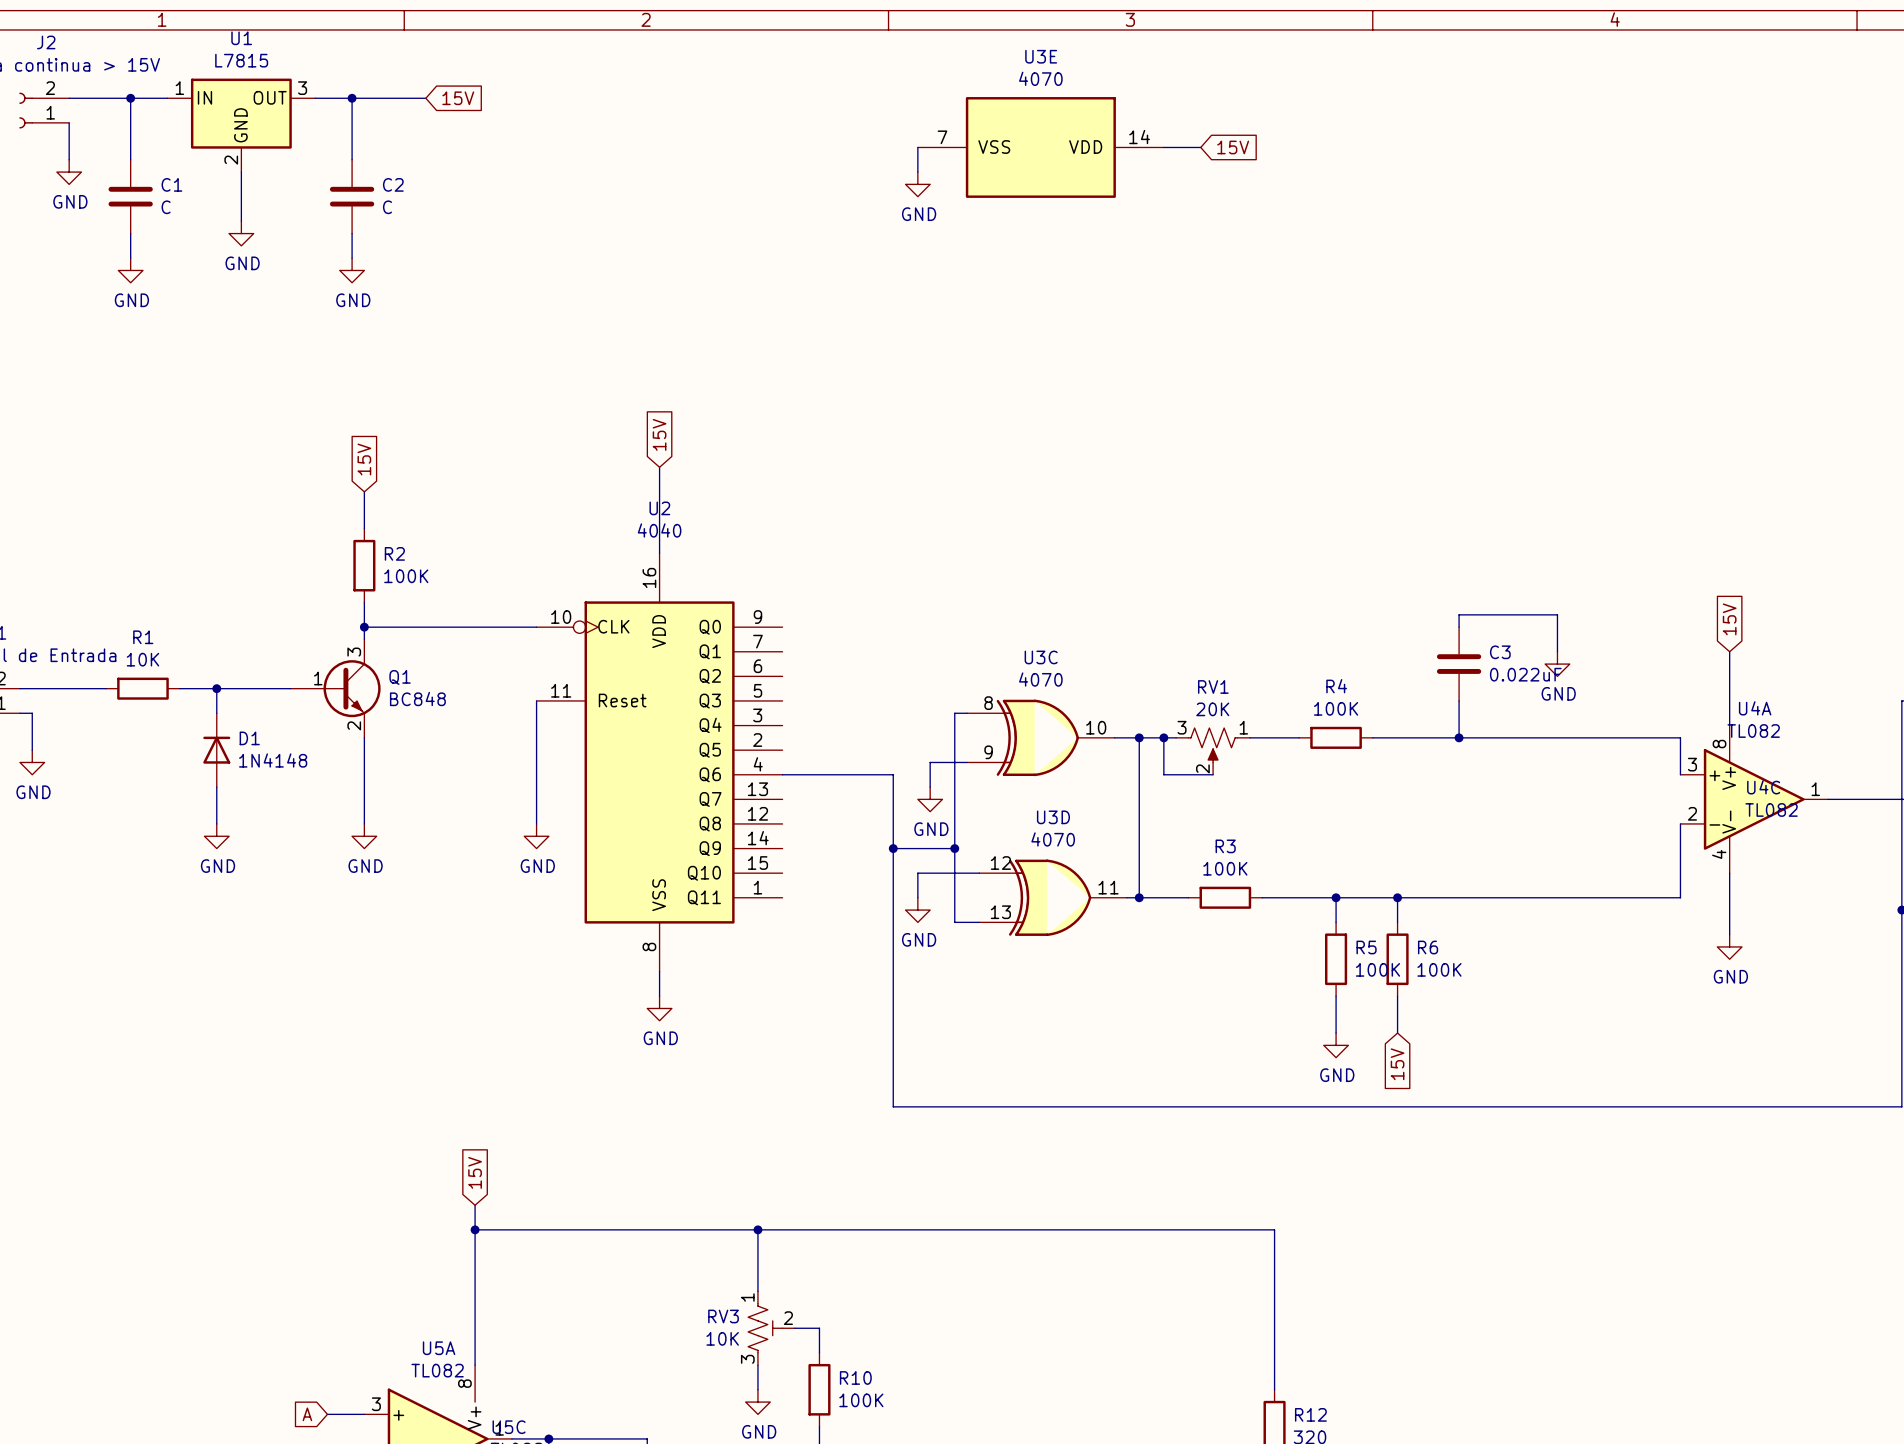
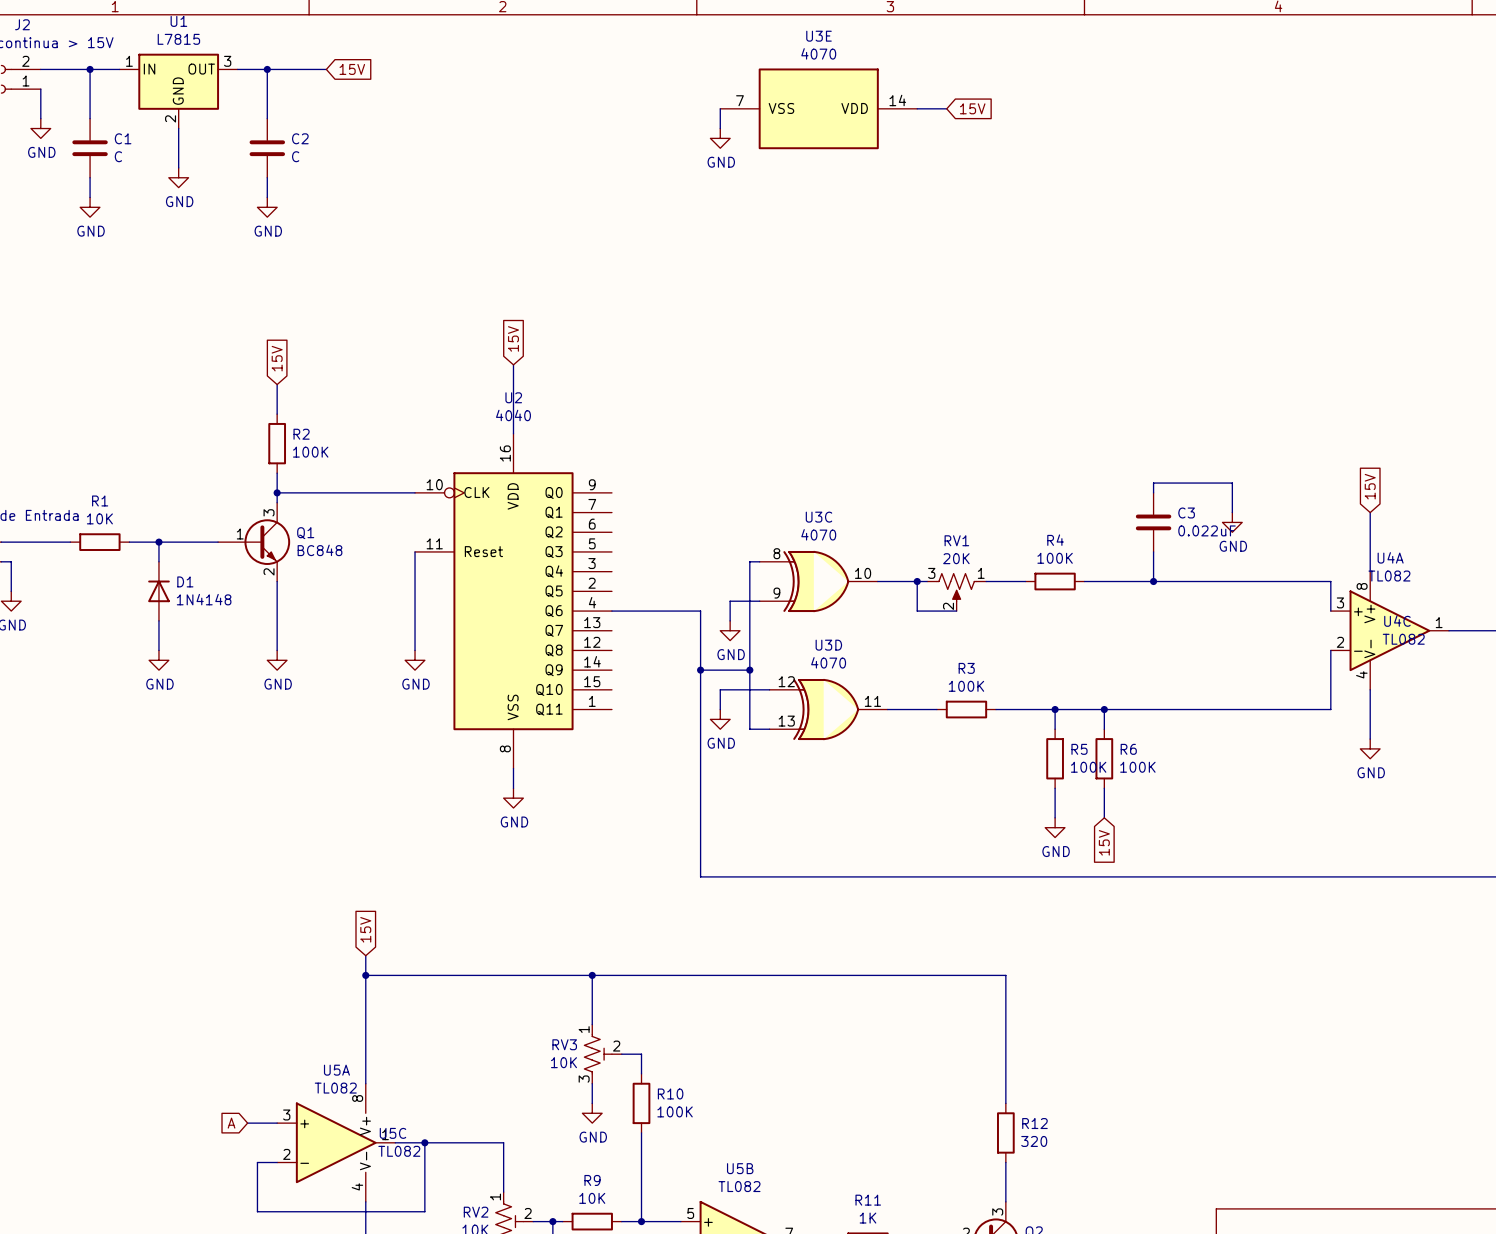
wire: (1139, 737) (1139, 897) -> none
junction: (1139, 737) -> none
junction: (1139, 897) -> none

